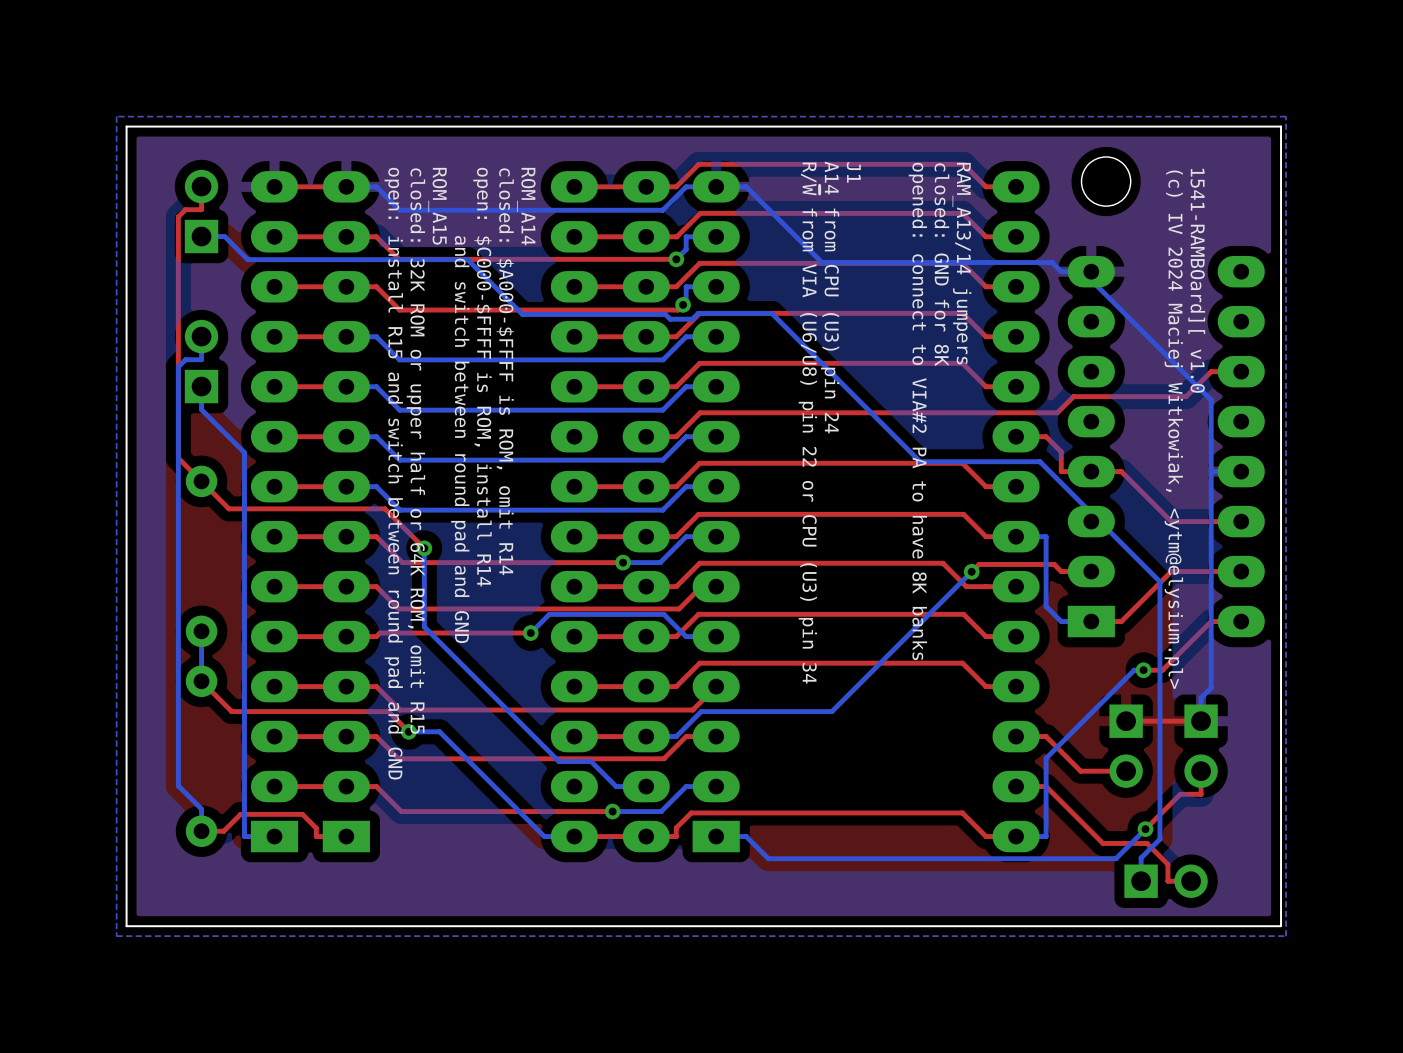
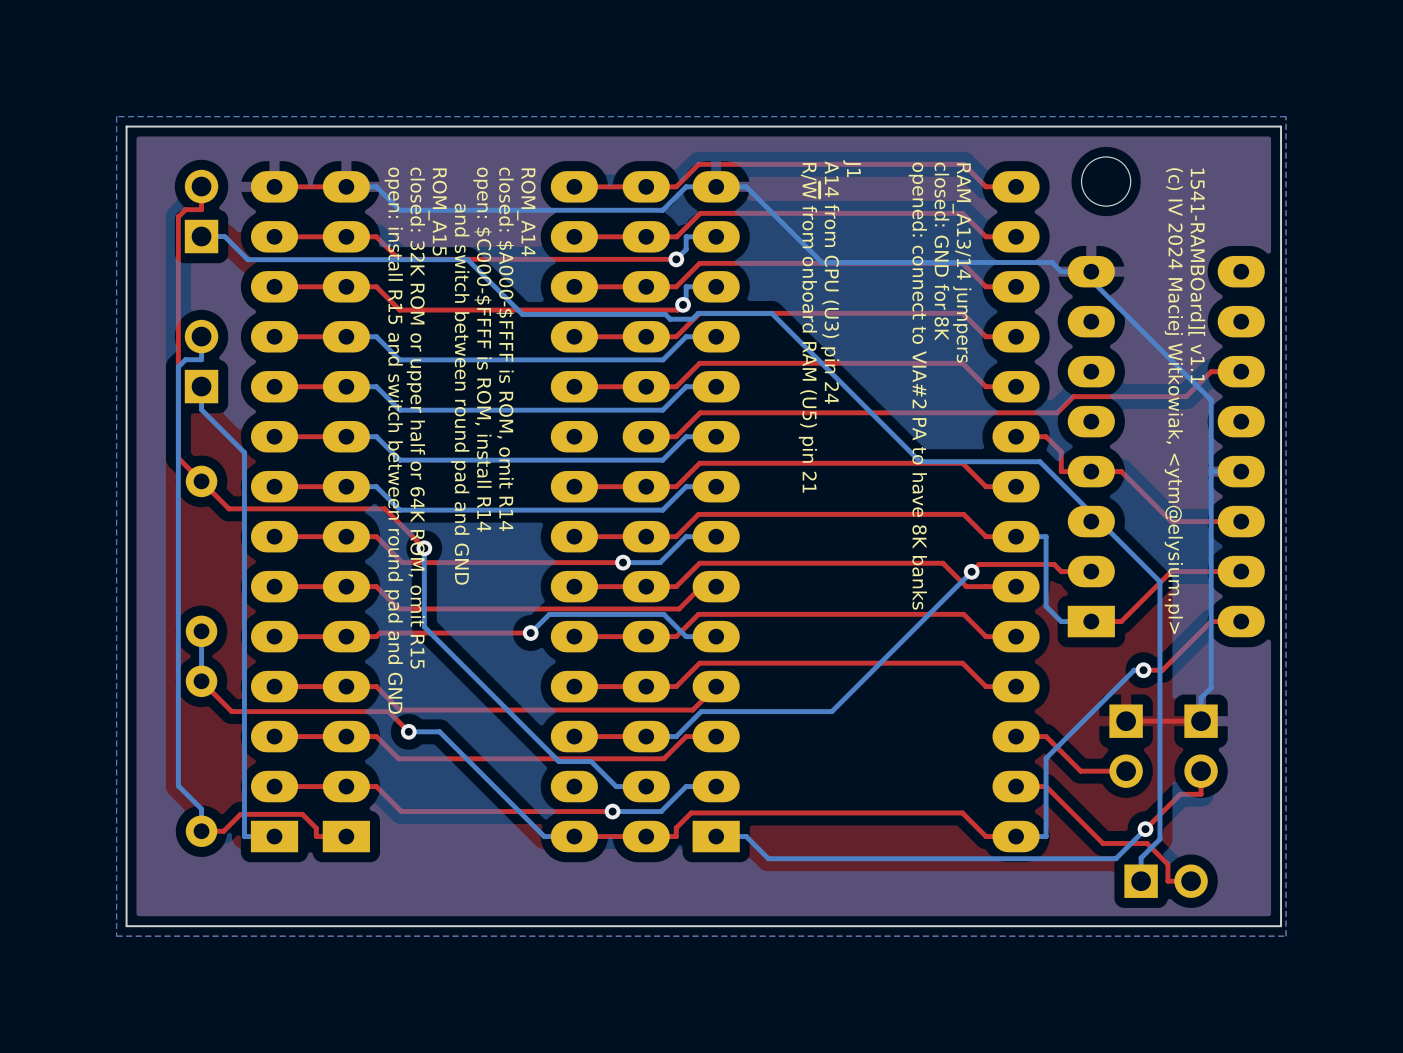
text: 1541-RAMBOard][ v1.0 (1196, 280) -> 1541-RAMBOard][ v1.1 (1196, 275)
text: R/~{W} from VIA (U6/U8) pin 22 or CPU (U3) pin 34 (809, 423) -> R/~{W} from onboard RAM (U5) pin 21 (809, 327)

